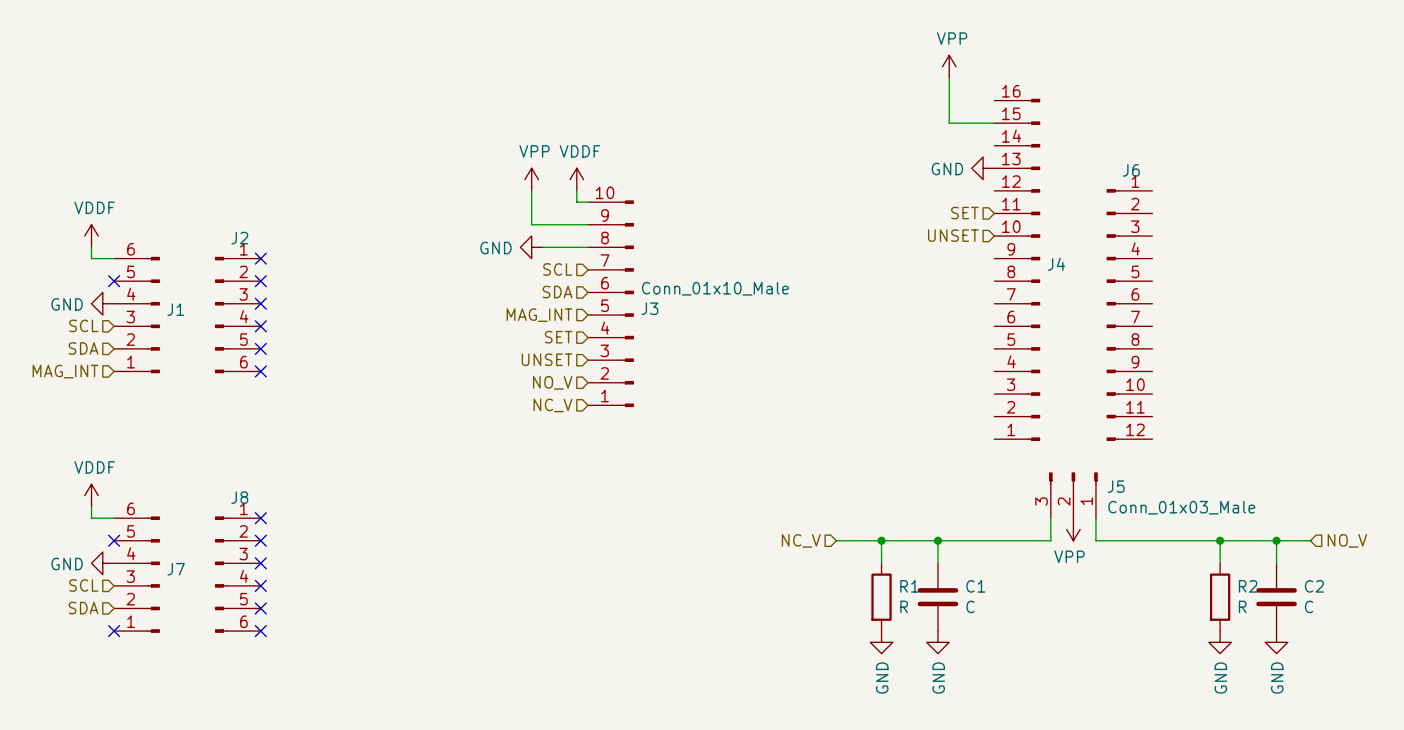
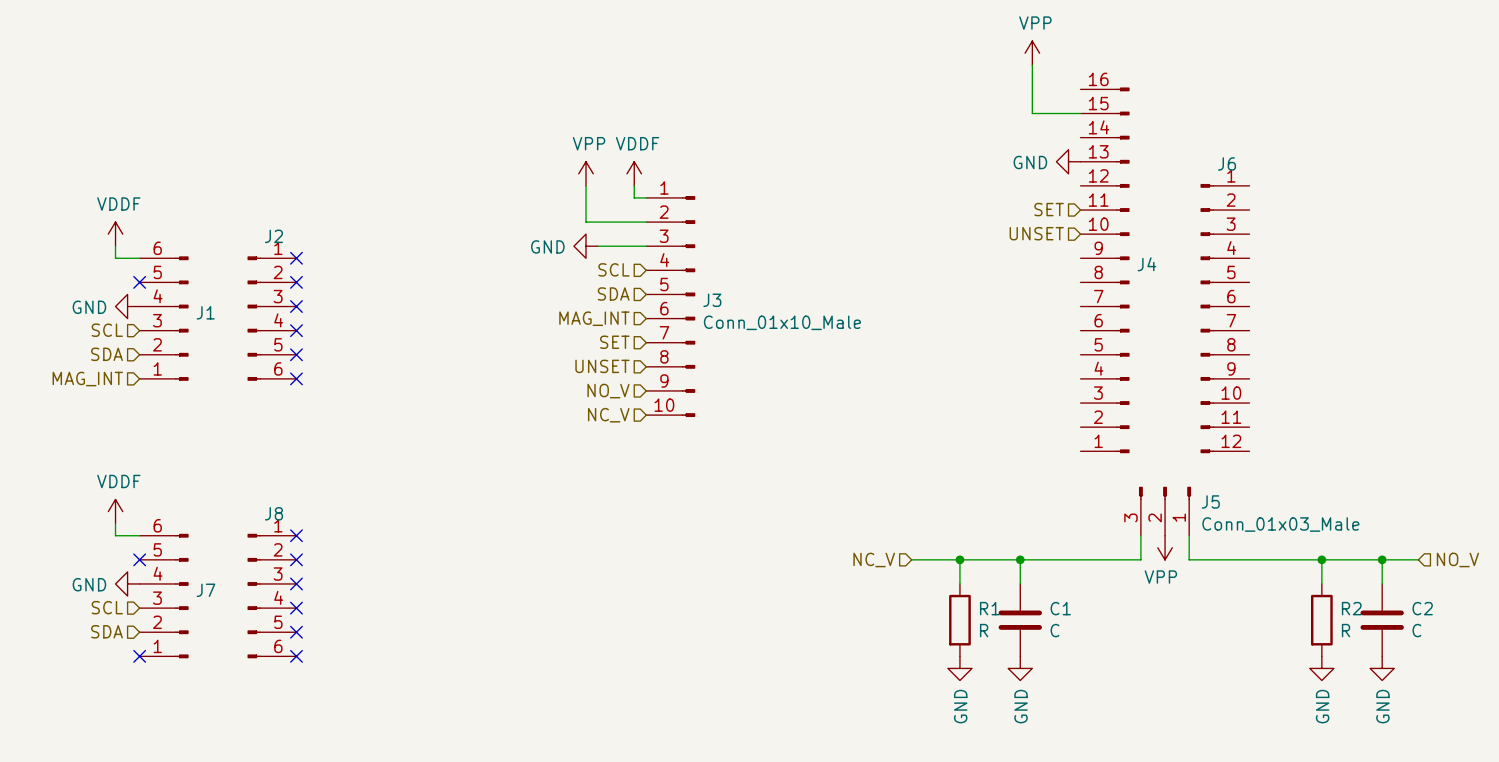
J3 flip: as is (627, 303) -> up-down (688, 306)

